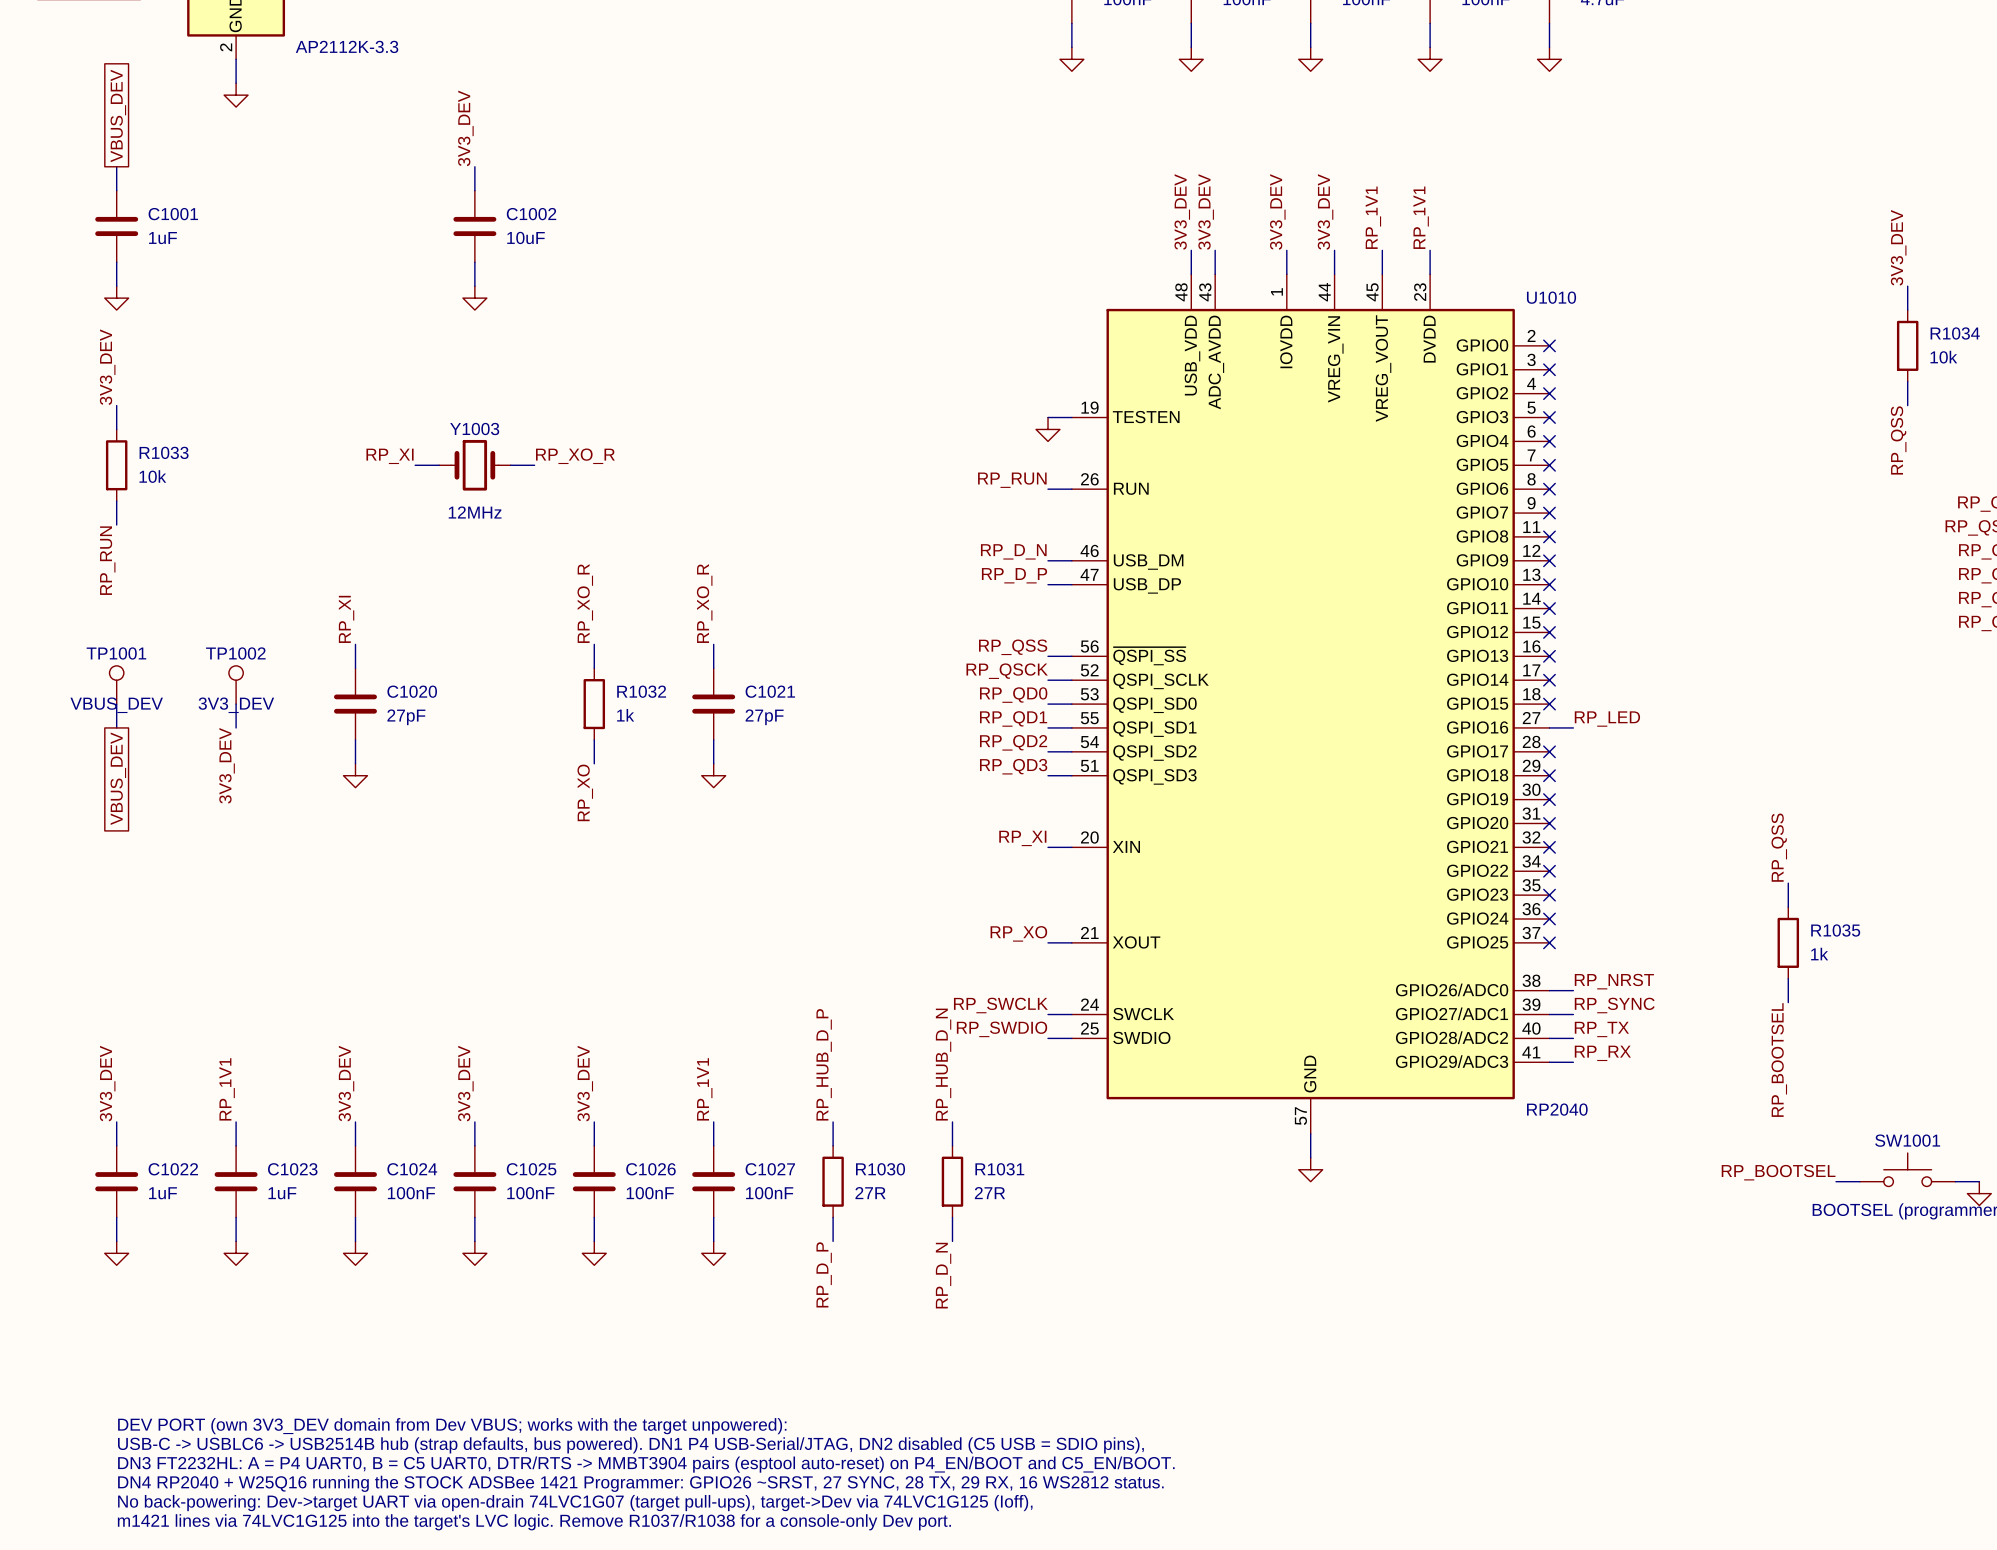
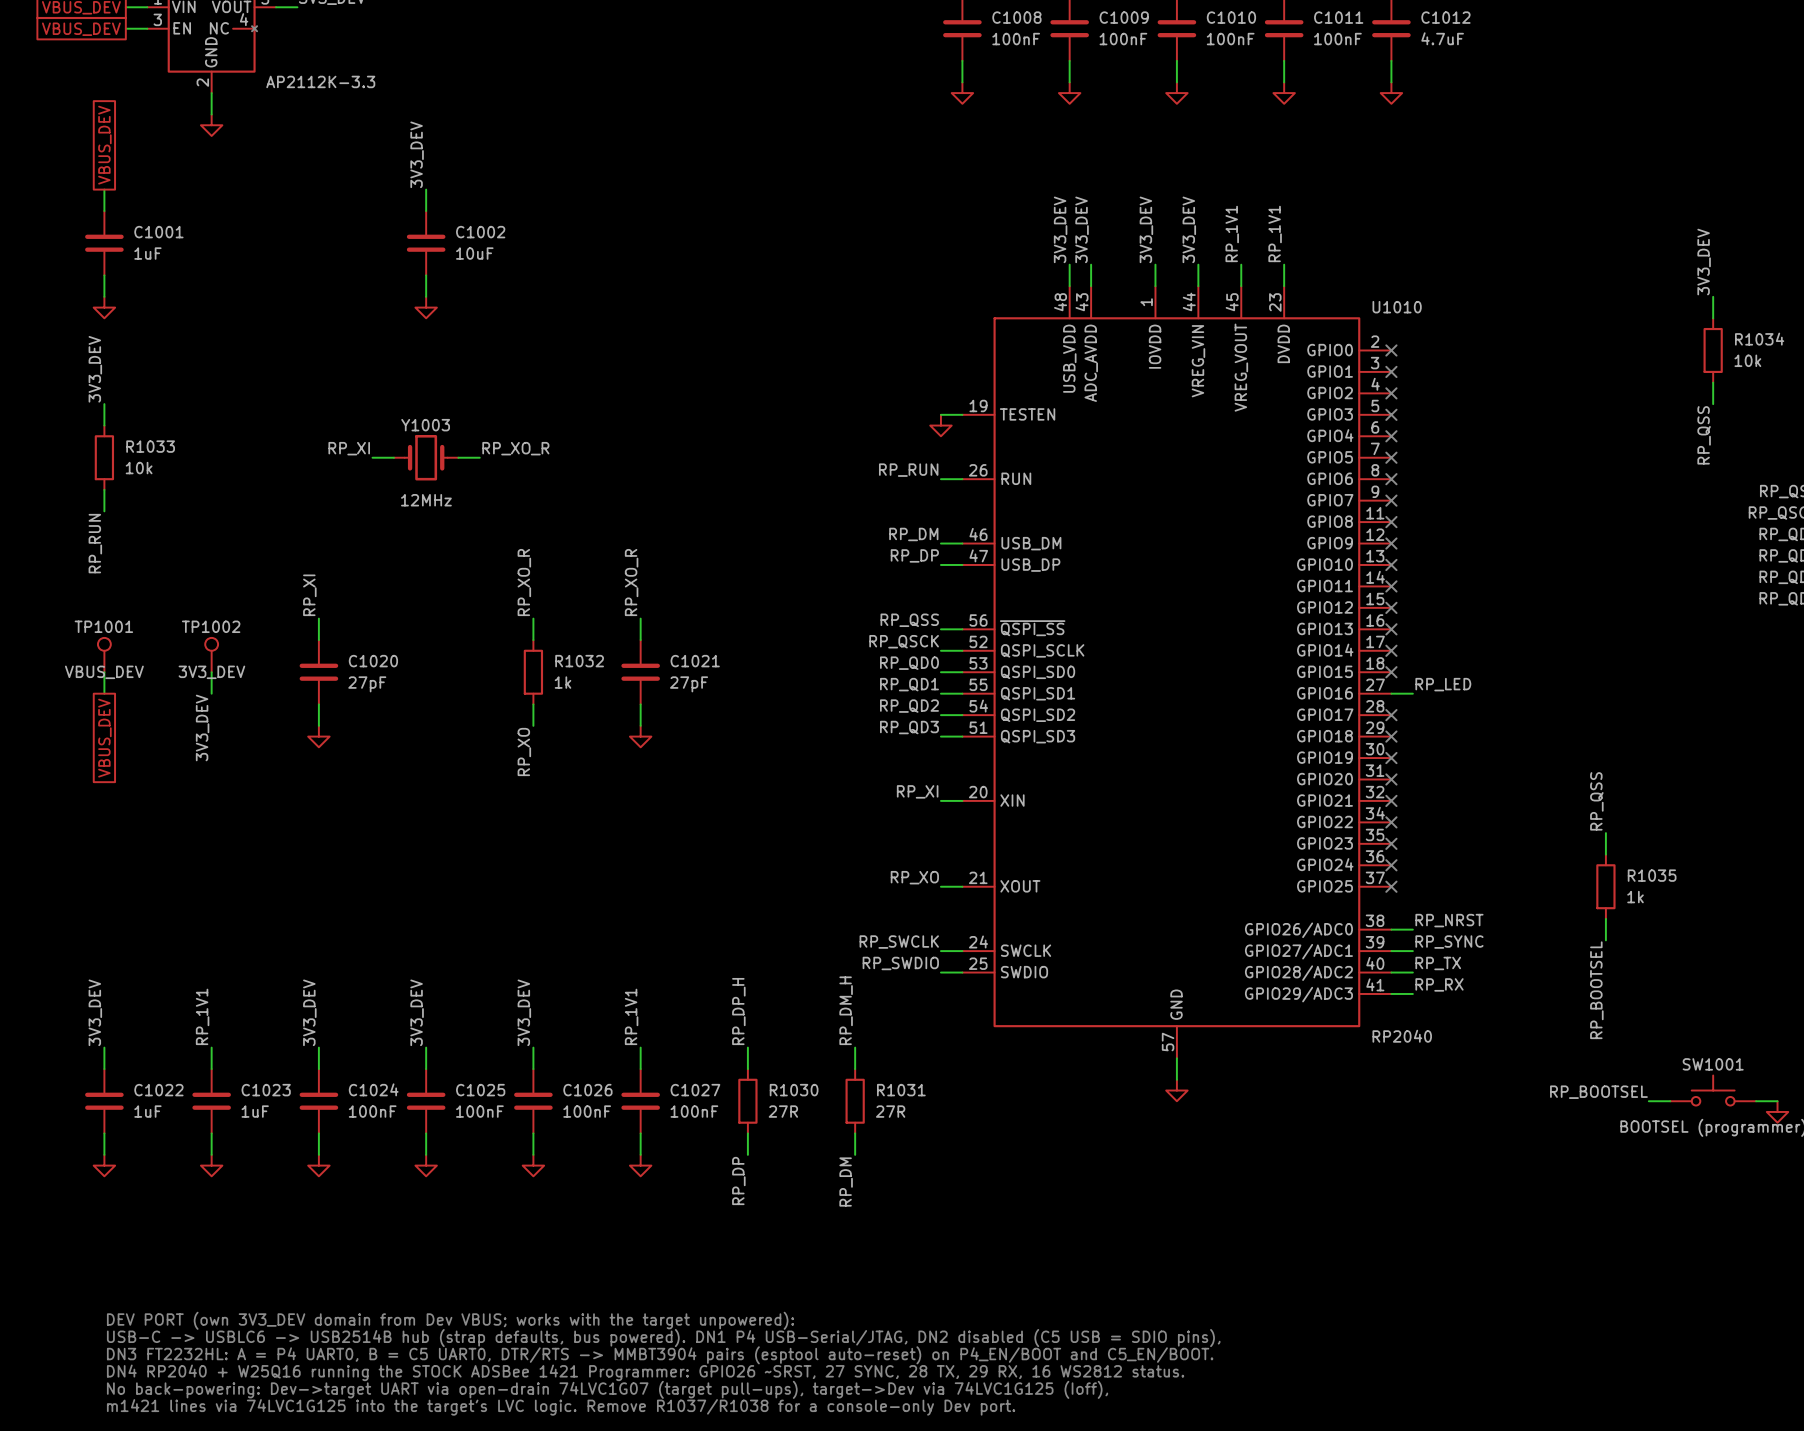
label: RP_D_N (1013, 551) -> RP_DM (913, 534)
label: RP_D_P (1014, 575) -> RP_DP (914, 555)
label: RP_HUB_D_P (824, 1064) -> RP_DP_H (738, 1011)
label: RP_HUB_D_N (943, 1064) -> RP_DM_H (846, 1010)
label: RP_D_P (824, 1274) -> RP_DP (738, 1180)
label: RP_D_N (943, 1275) -> RP_DM (846, 1182)

